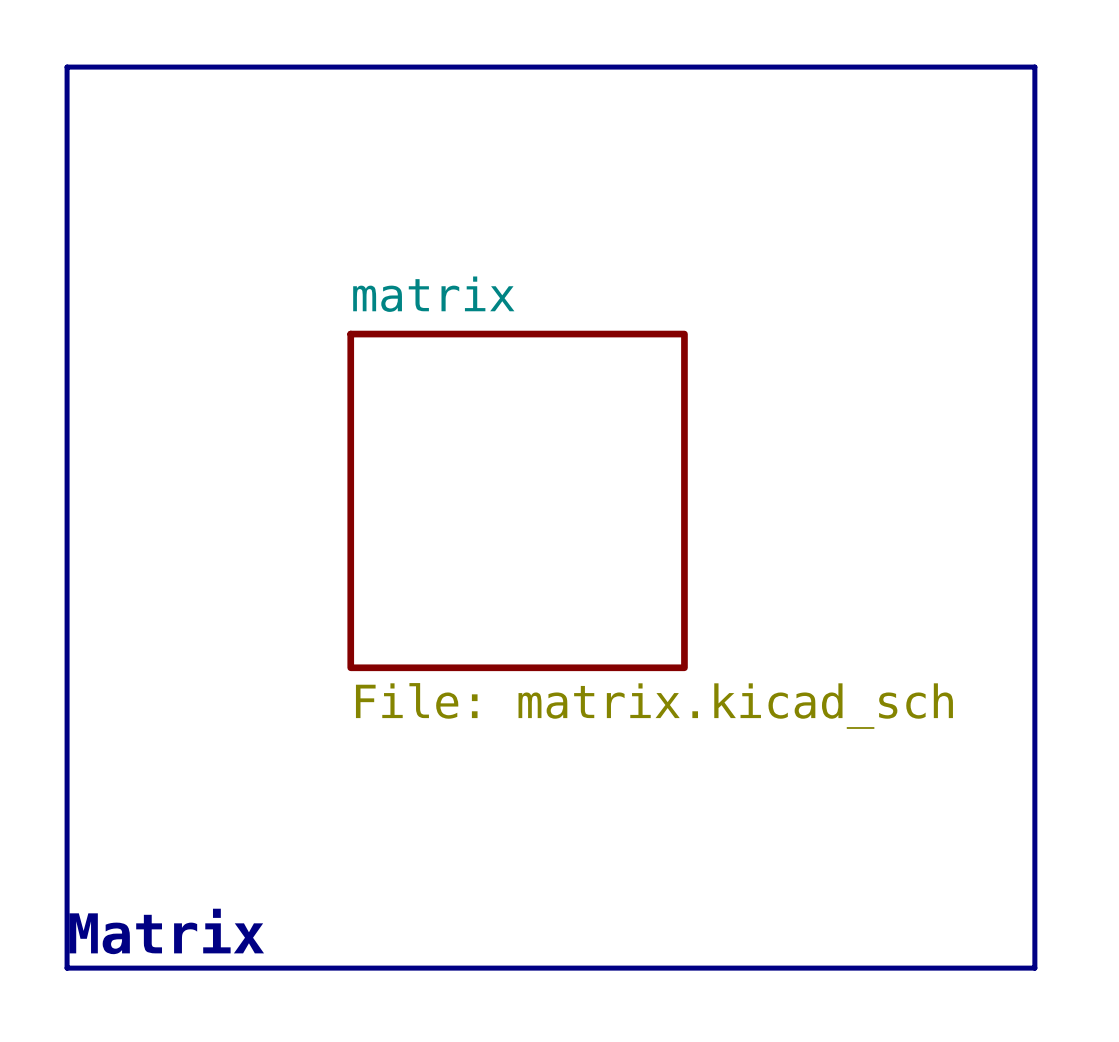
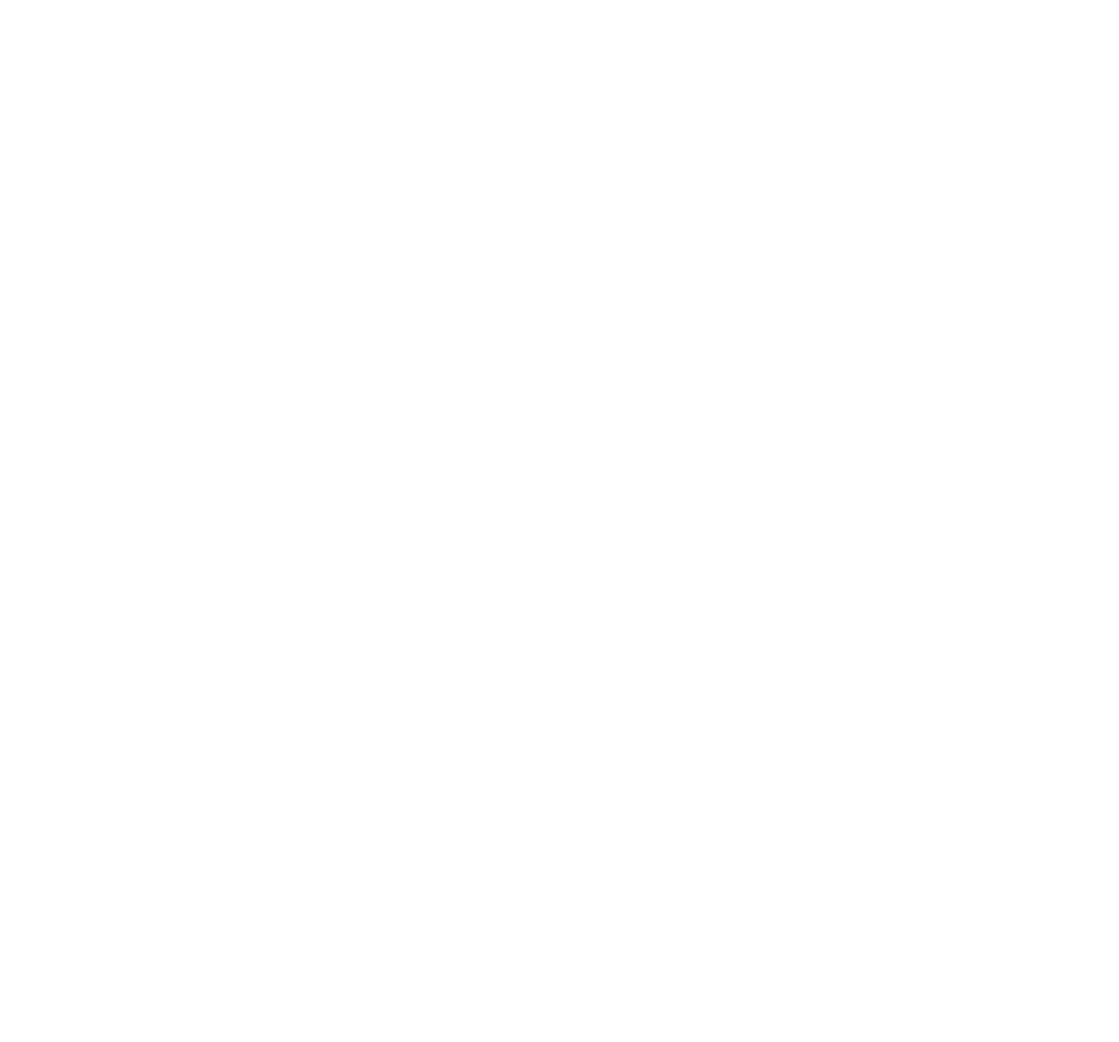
line: (67, 67) (1034, 67) (1034, 968) (67, 968) (67, 67) -> none
sheet matrix: File: matrix.kicad_sch (517, 500) -> none
text: Matrix (166, 931) -> none

